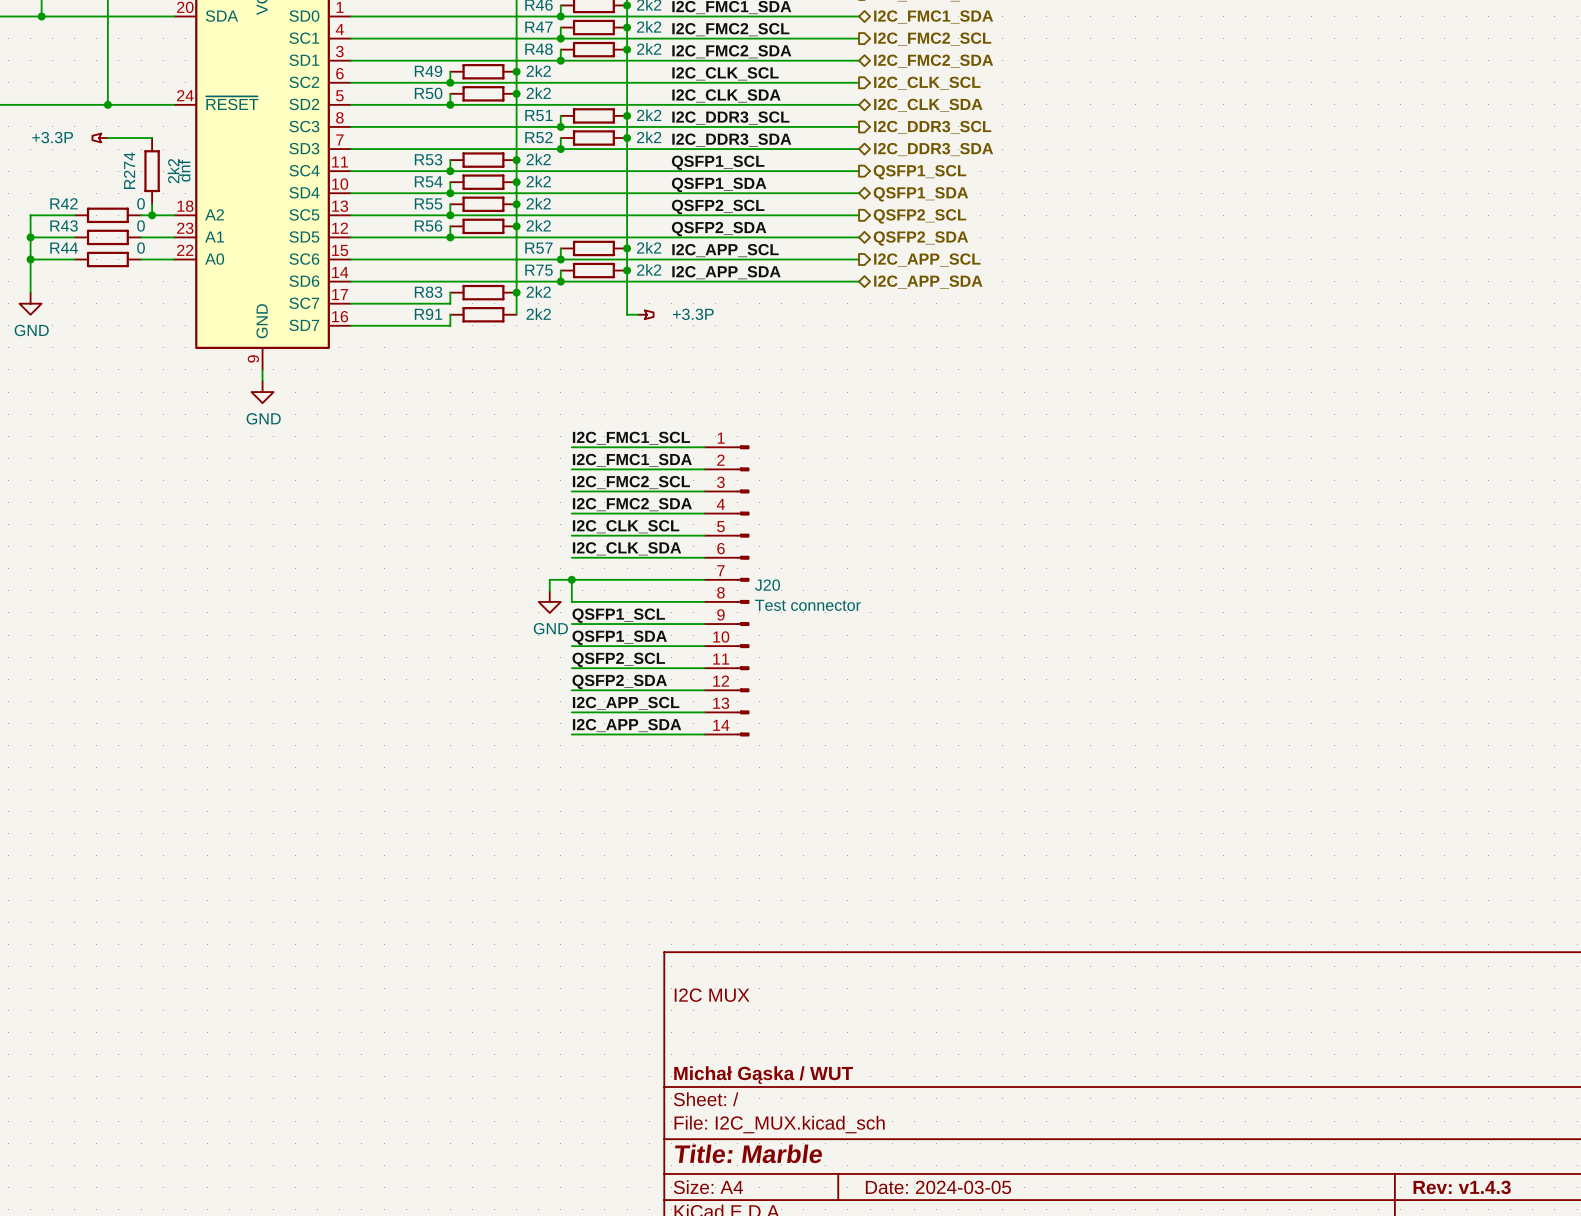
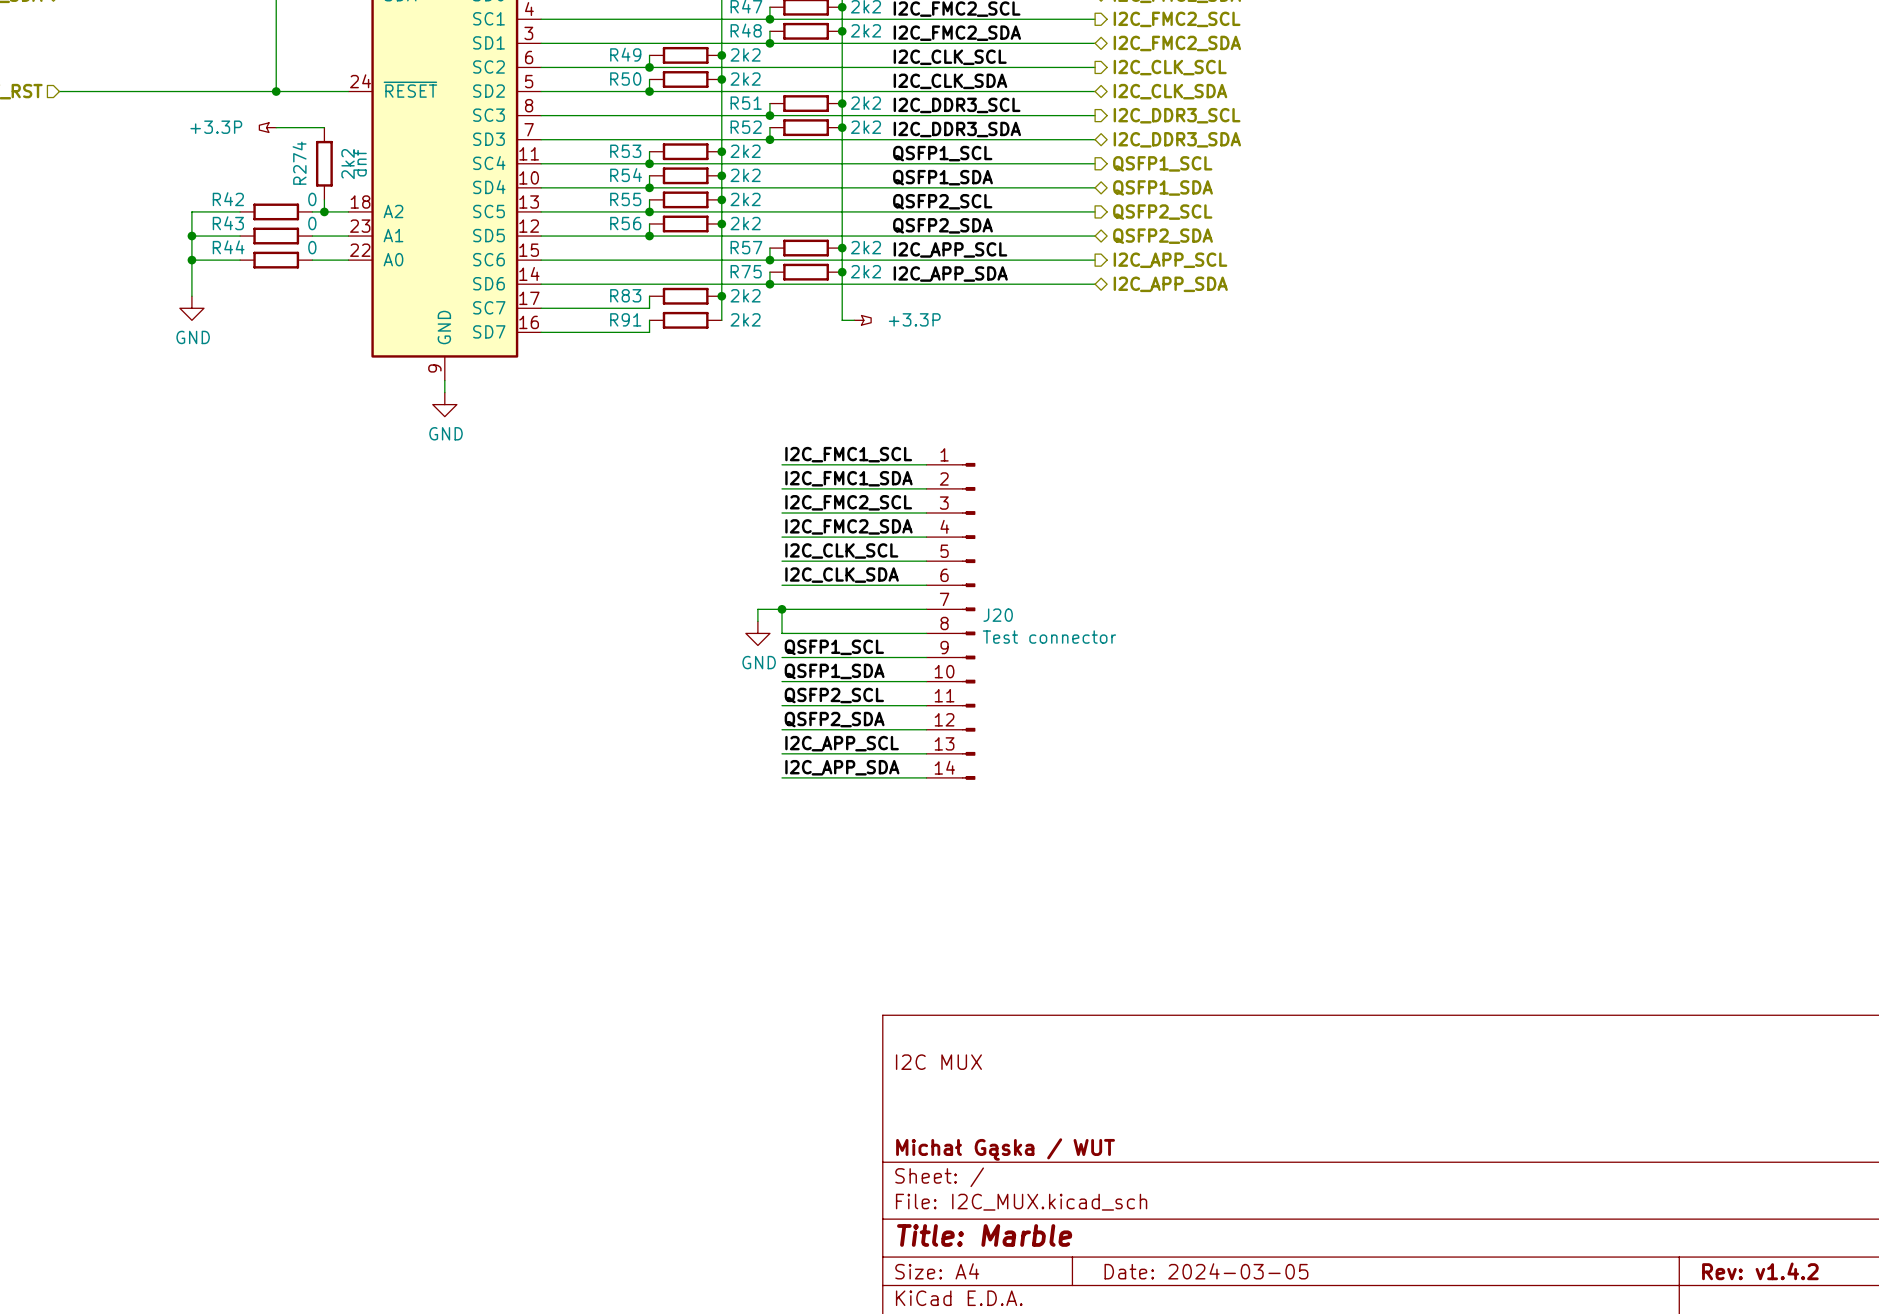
title block: Rev: v1.4.3 (1462, 1187) -> Rev: v1.4.2 (1760, 1271)

